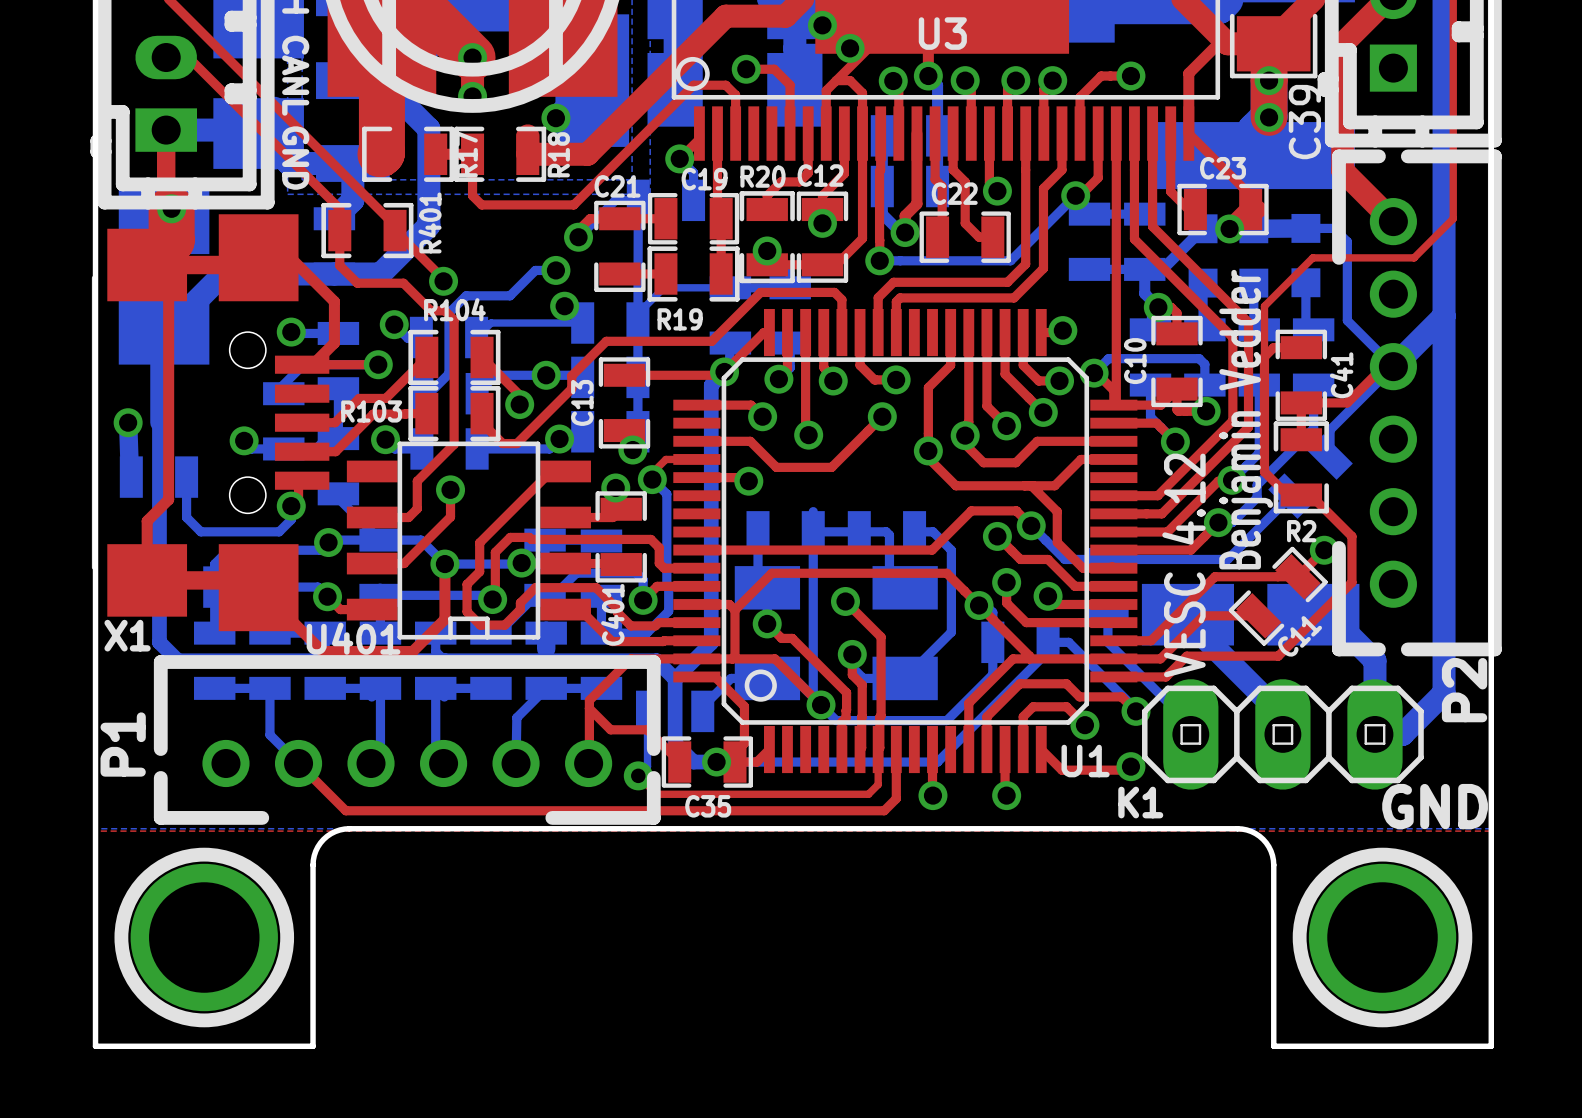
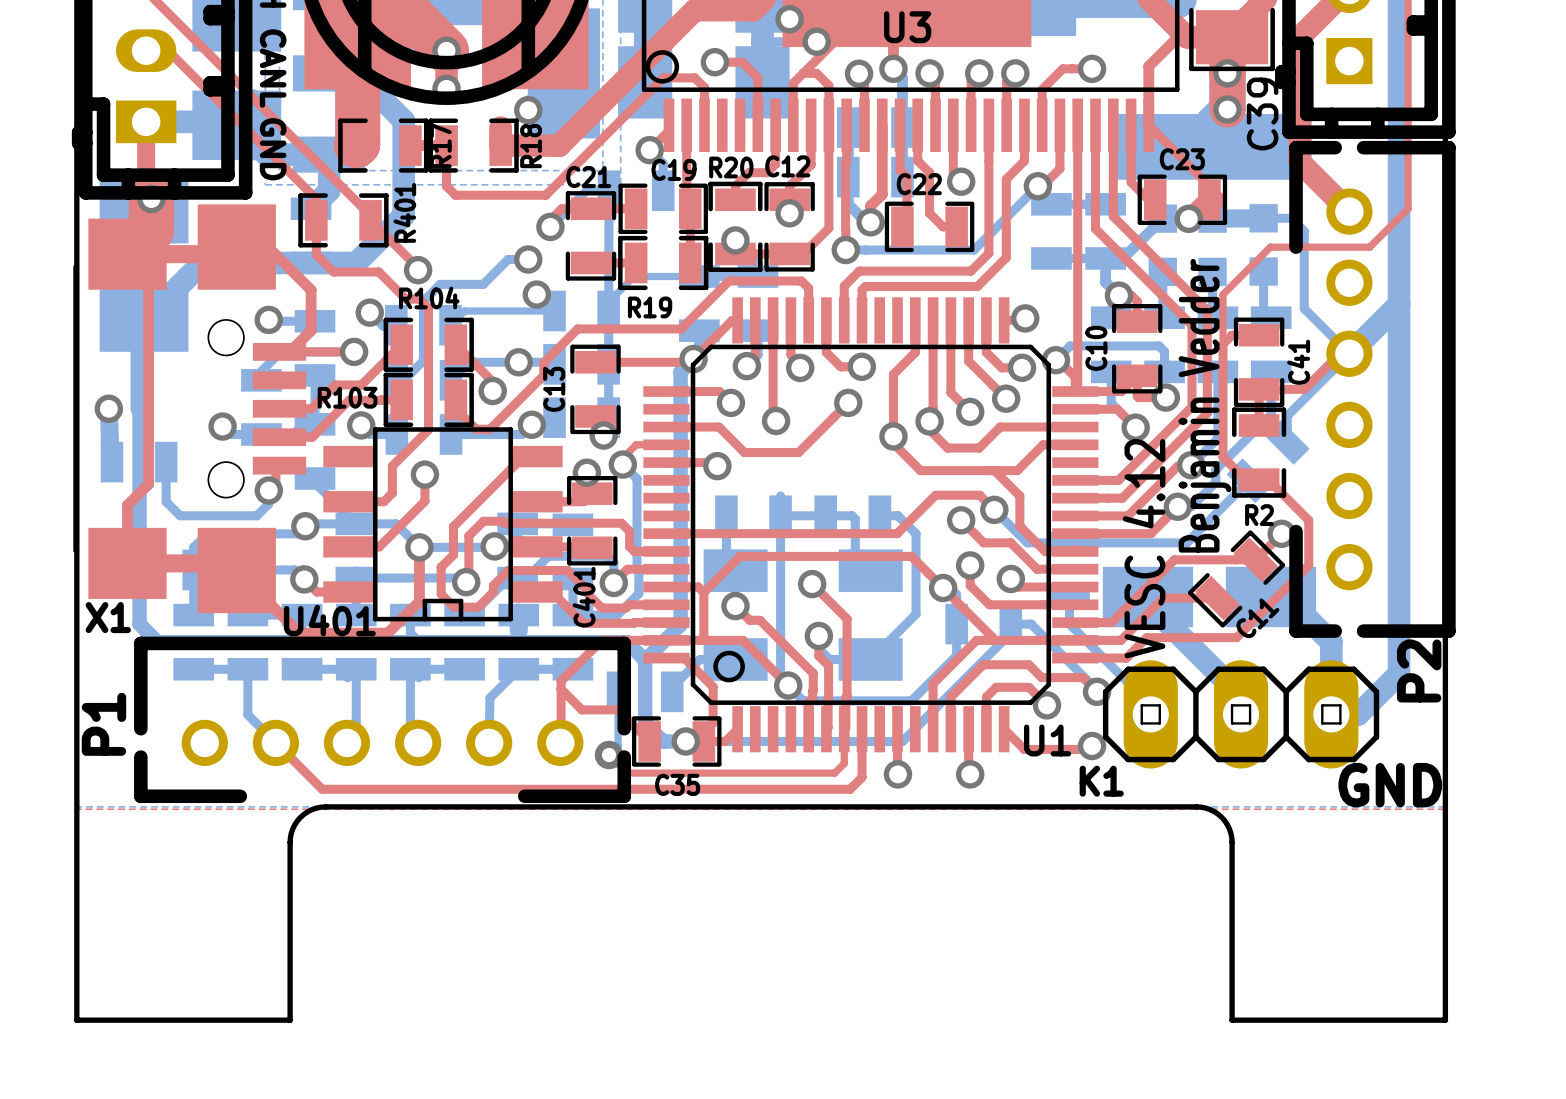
part: (204, 937) -> none
part: (1382, 937) -> none

